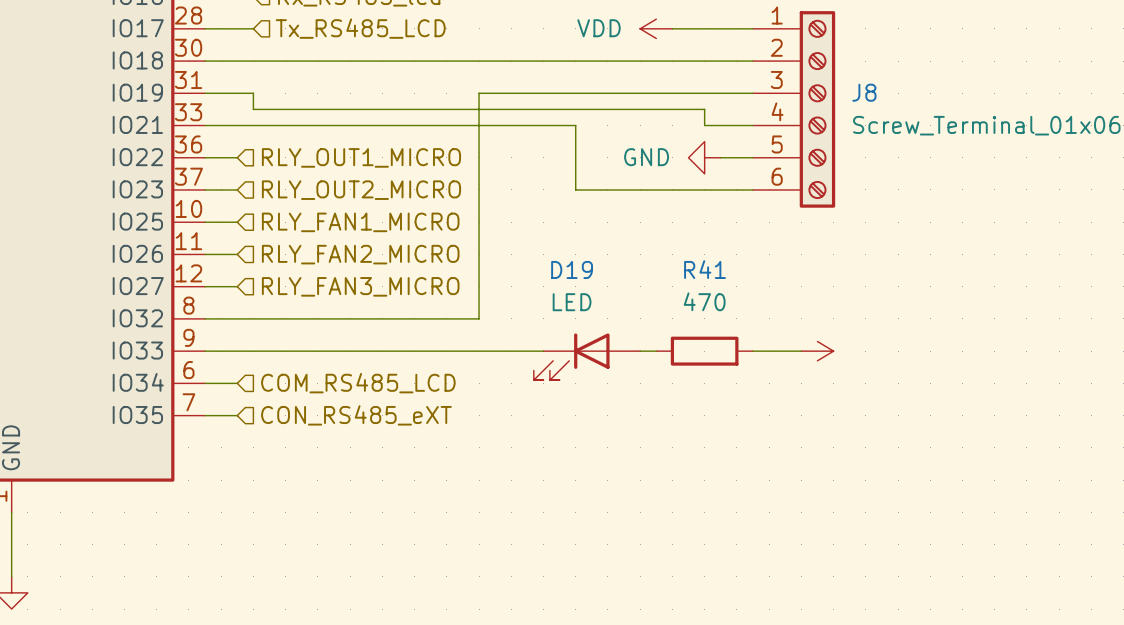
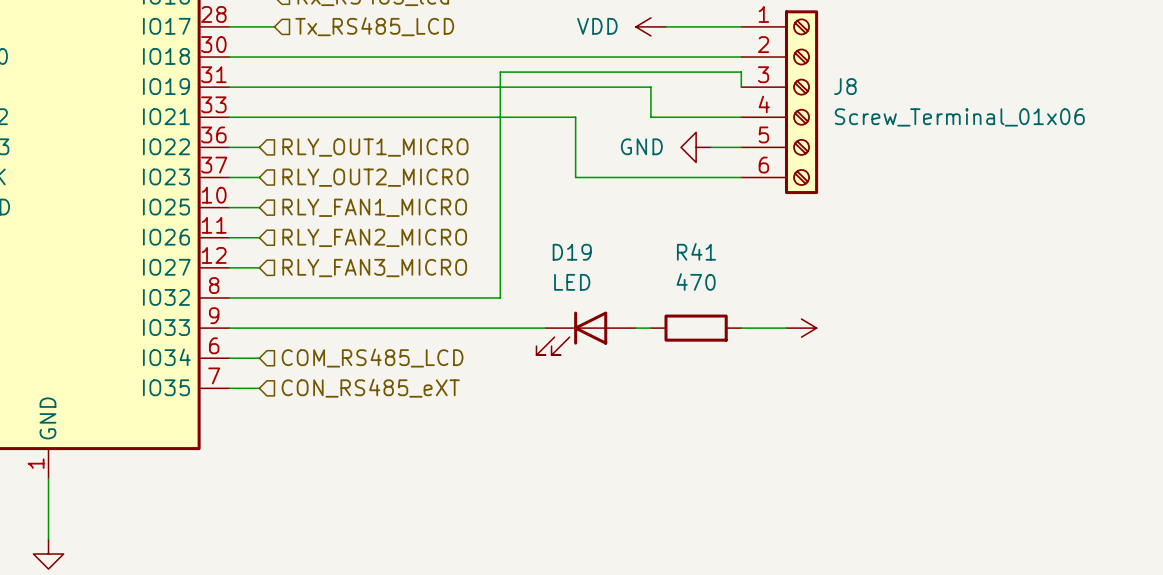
wire: (253, 93) (253, 109) (704, 109) (704, 125) -> (274, 87) (485, 87)
wire: (479, 93) (479, 318) -> (741, 87) (741, 72) (500, 72) (500, 297) (485, 297)
wire: (656, 93) (752, 93) -> (650, 87) (650, 117) (696, 117)

